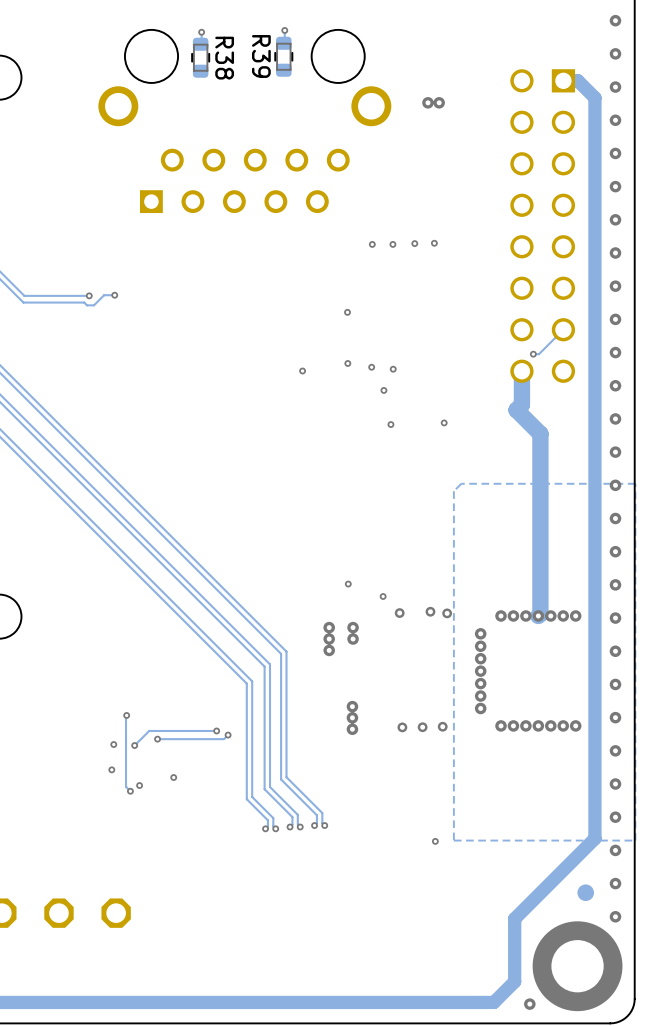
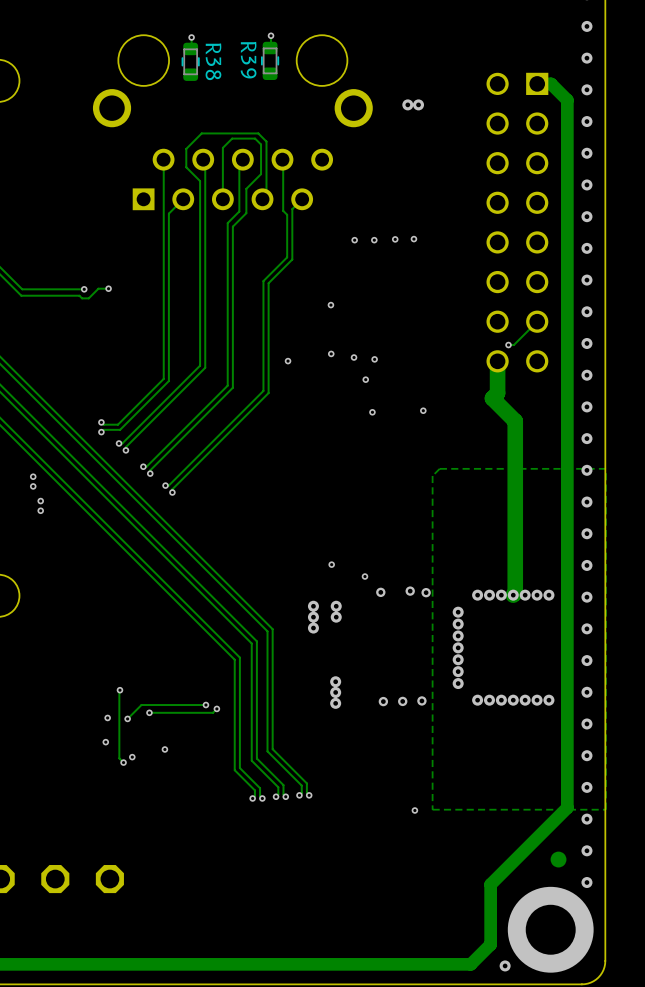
track: none -> (163, 159) (163, 378) (117, 424) (103, 424) (101, 422)
track: none -> (203, 159) (205, 161) (205, 367) (125, 447) (125, 450)
track: none -> (242, 159) (239, 163) (239, 211) (227, 223) (227, 385) (146, 466) (143, 466)
track: none -> (282, 159) (283, 210) (287, 214) (287, 257) (263, 281) (263, 390) (168, 485) (165, 485)
track: none -> (183, 199) (168, 213) (168, 381) (120, 429) (103, 429) (101, 432)
track: none -> (222, 199) (222, 147) (232, 138) (255, 138) (261, 144) (261, 174) (246, 188) (246, 213) (232, 226) (232, 387) (150, 470) (150, 473)
track: none -> (262, 199) (266, 195) (266, 141) (258, 133) (201, 133) (186, 148) (186, 167) (200, 181) (200, 365) (122, 443) (119, 443)
track: none -> (302, 199) (292, 209) (292, 259) (268, 283) (268, 393) (172, 489) (172, 492)
via: none -> (101, 422)
via: none -> (101, 432)
via: none -> (119, 443)
via: none -> (125, 450)
via: none -> (143, 466)
via: none -> (150, 473)
via: none -> (33, 476)
via: none -> (165, 485)
via: none -> (33, 486)
via: none -> (172, 492)
via: none -> (40, 501)
via: none -> (40, 510)

